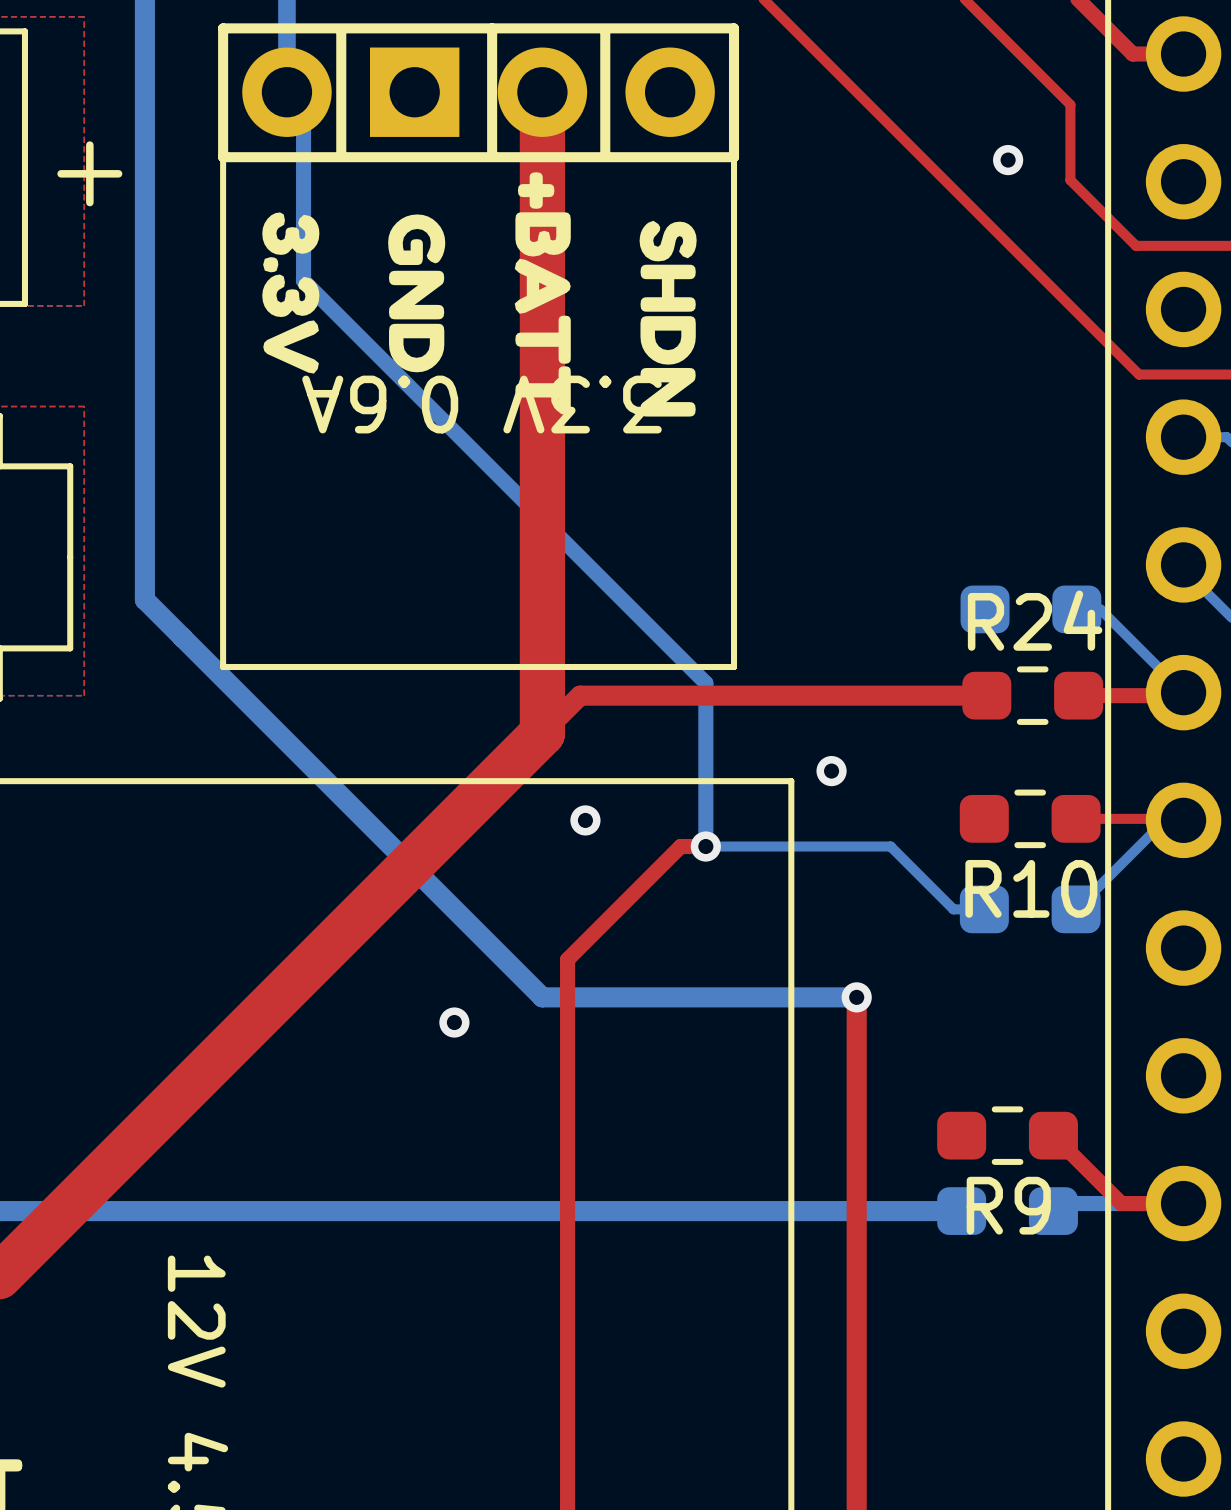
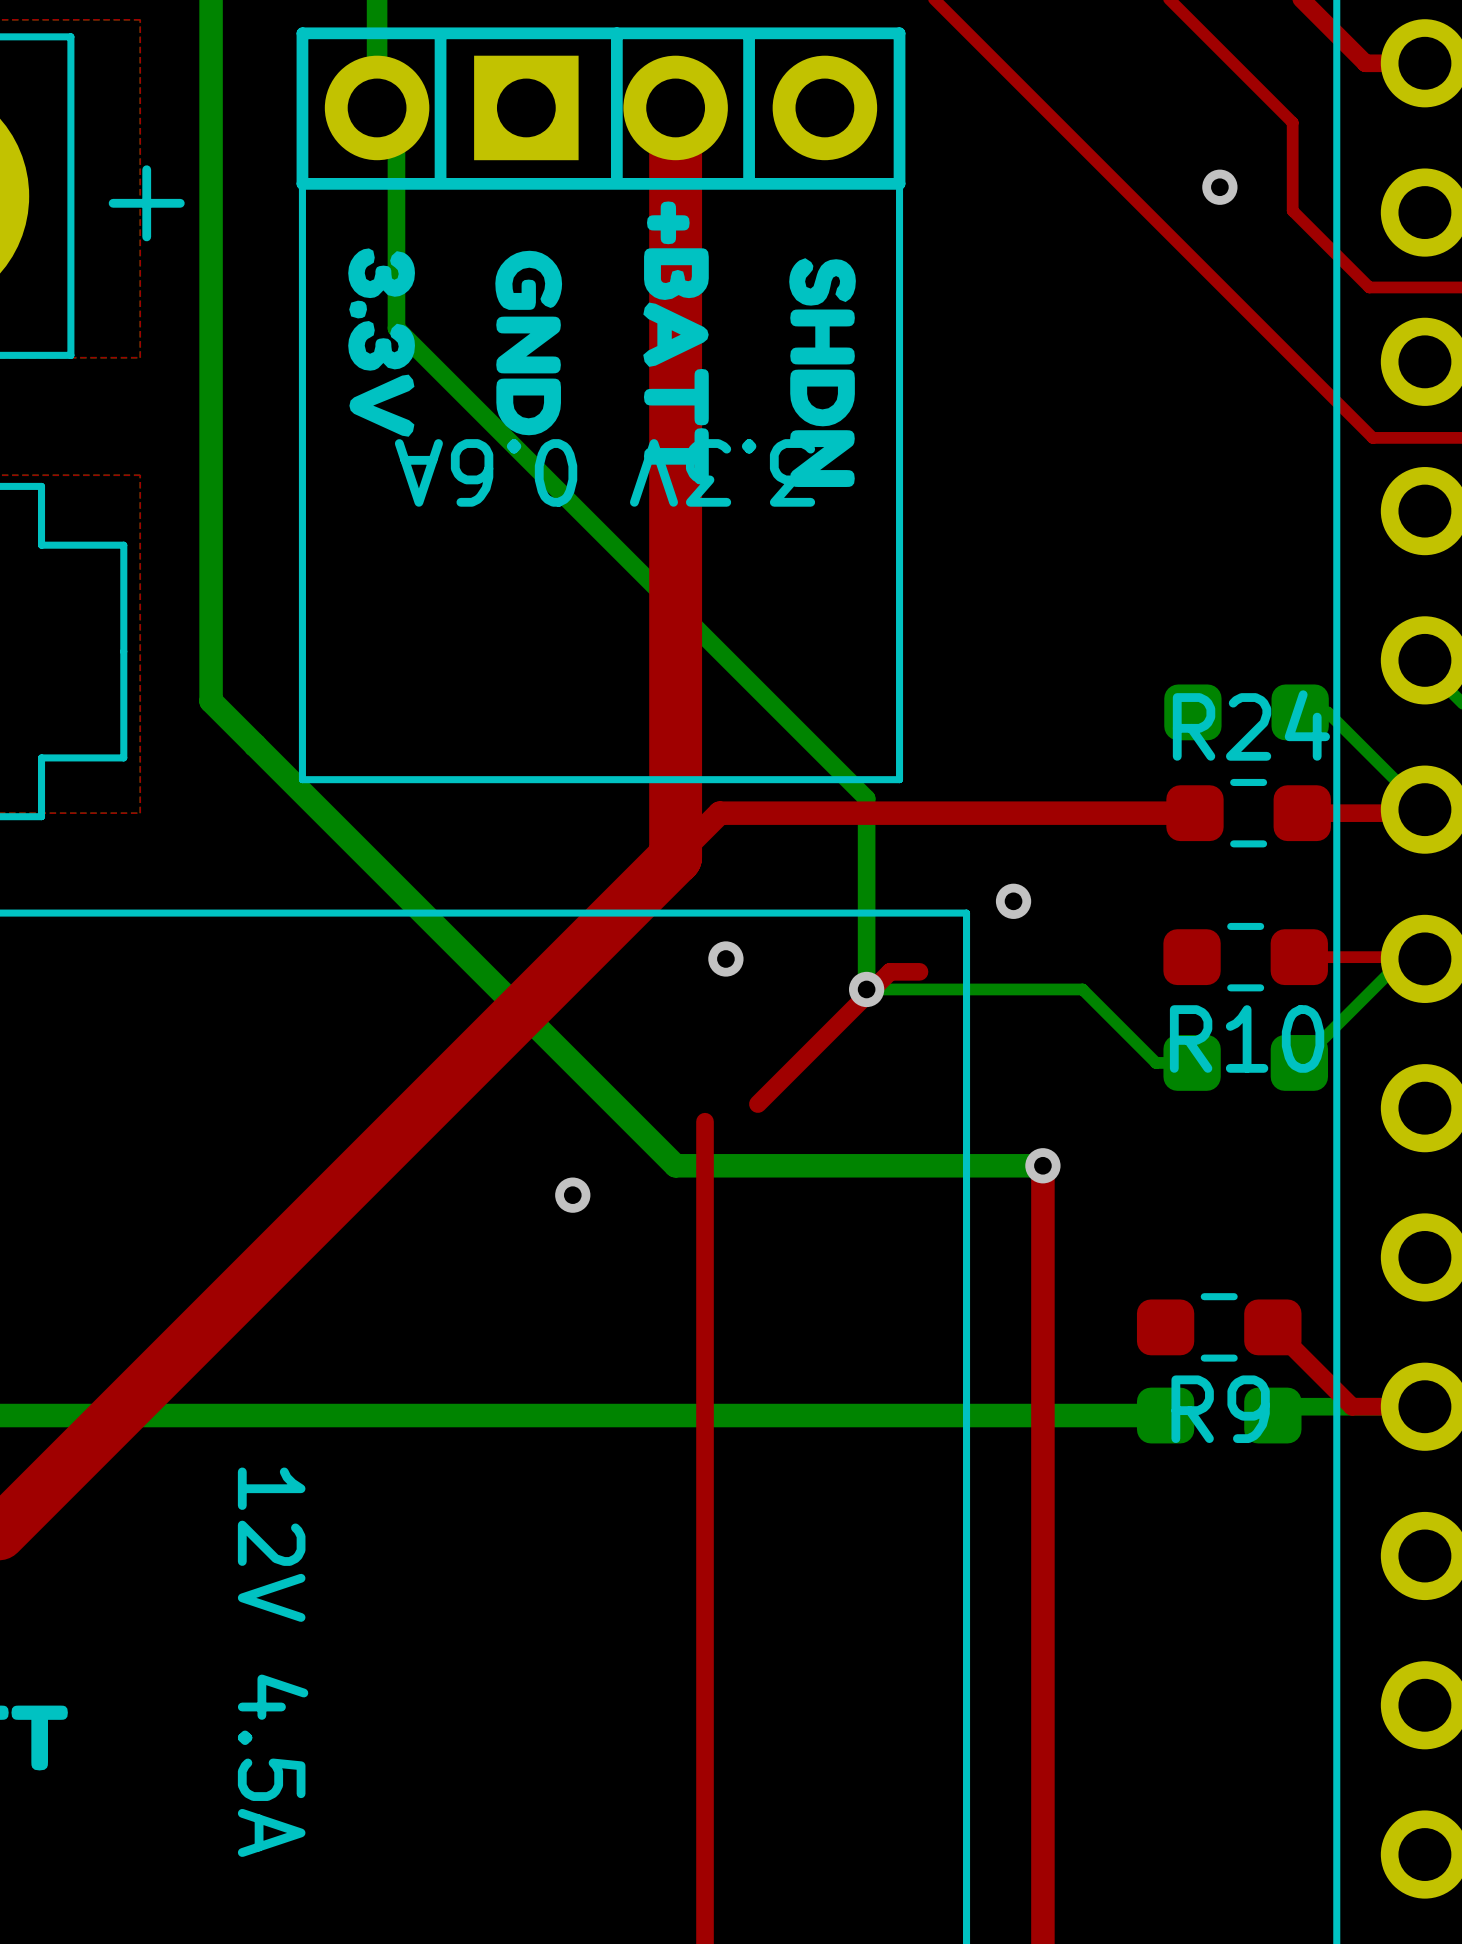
top track: (705, 846) (680, 846) (567, 959) -> (919, 971) (890, 971) (757, 1104)

